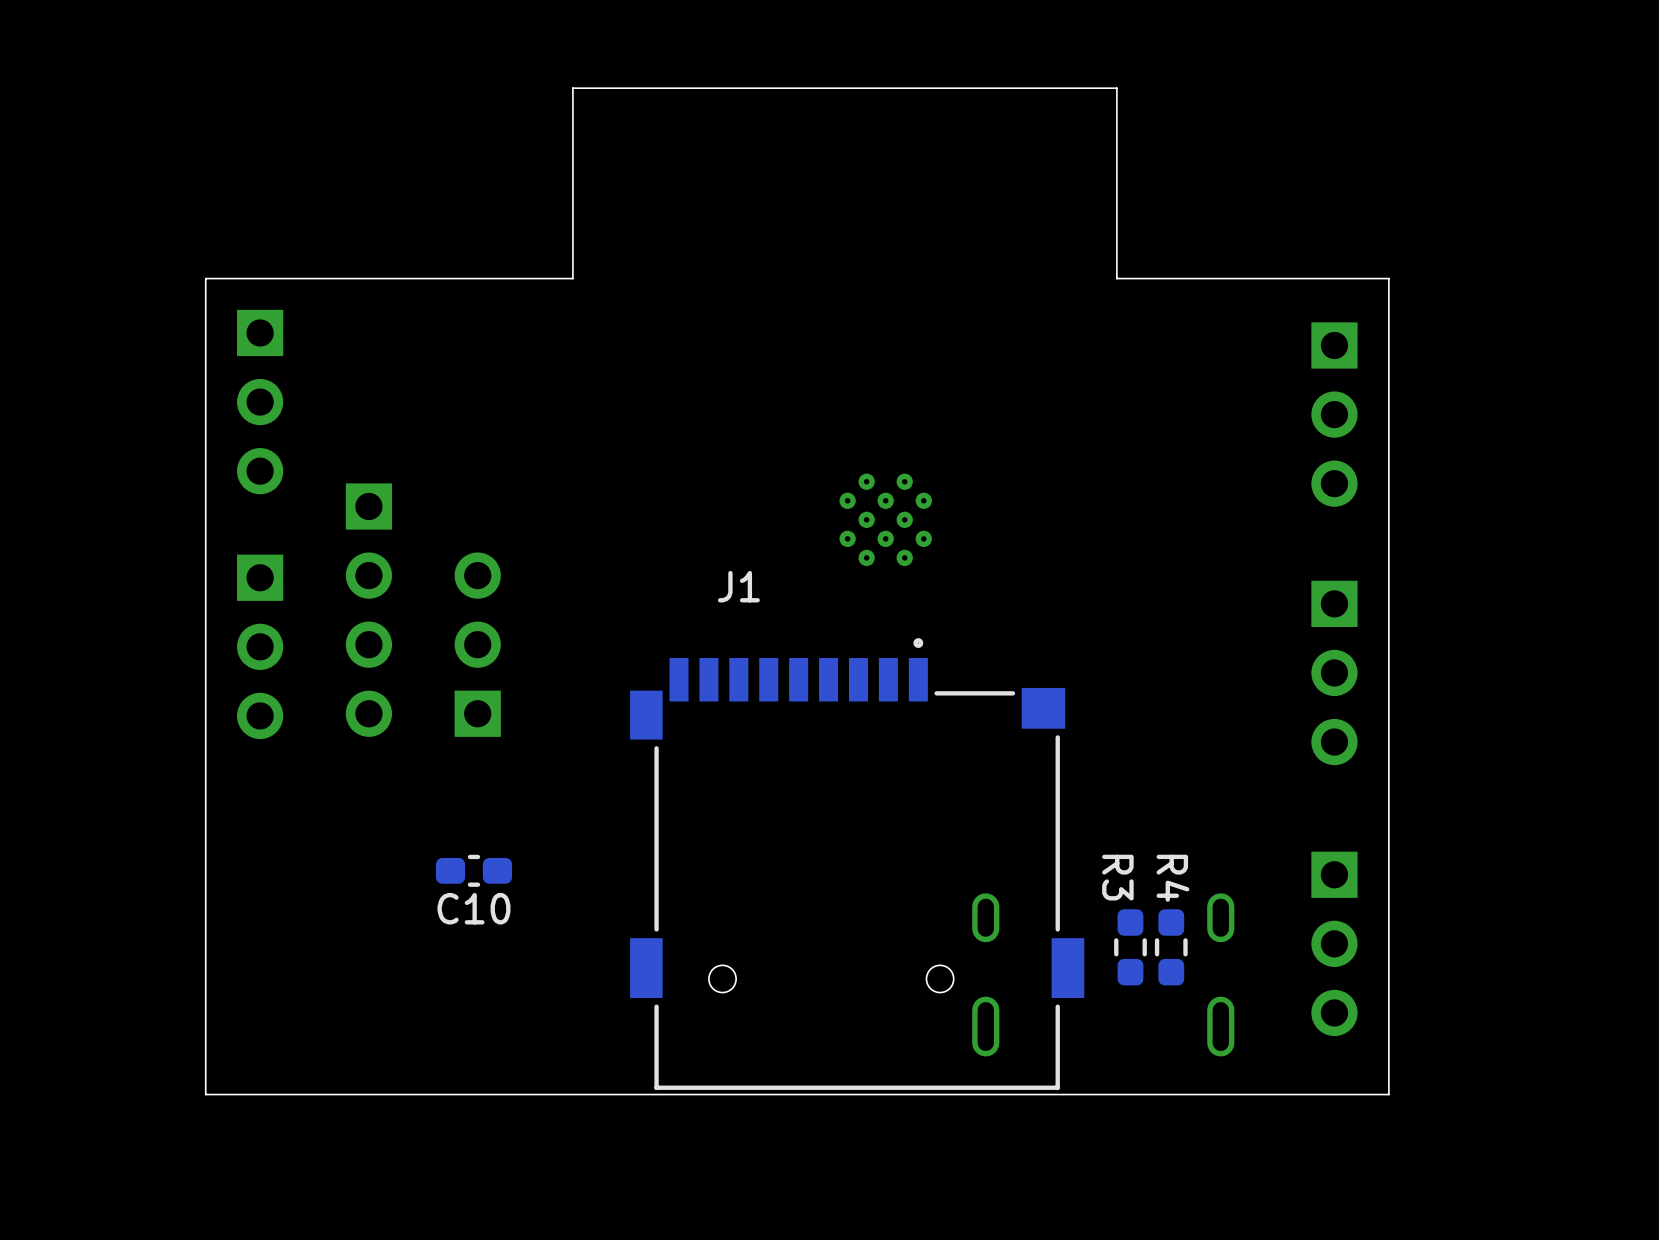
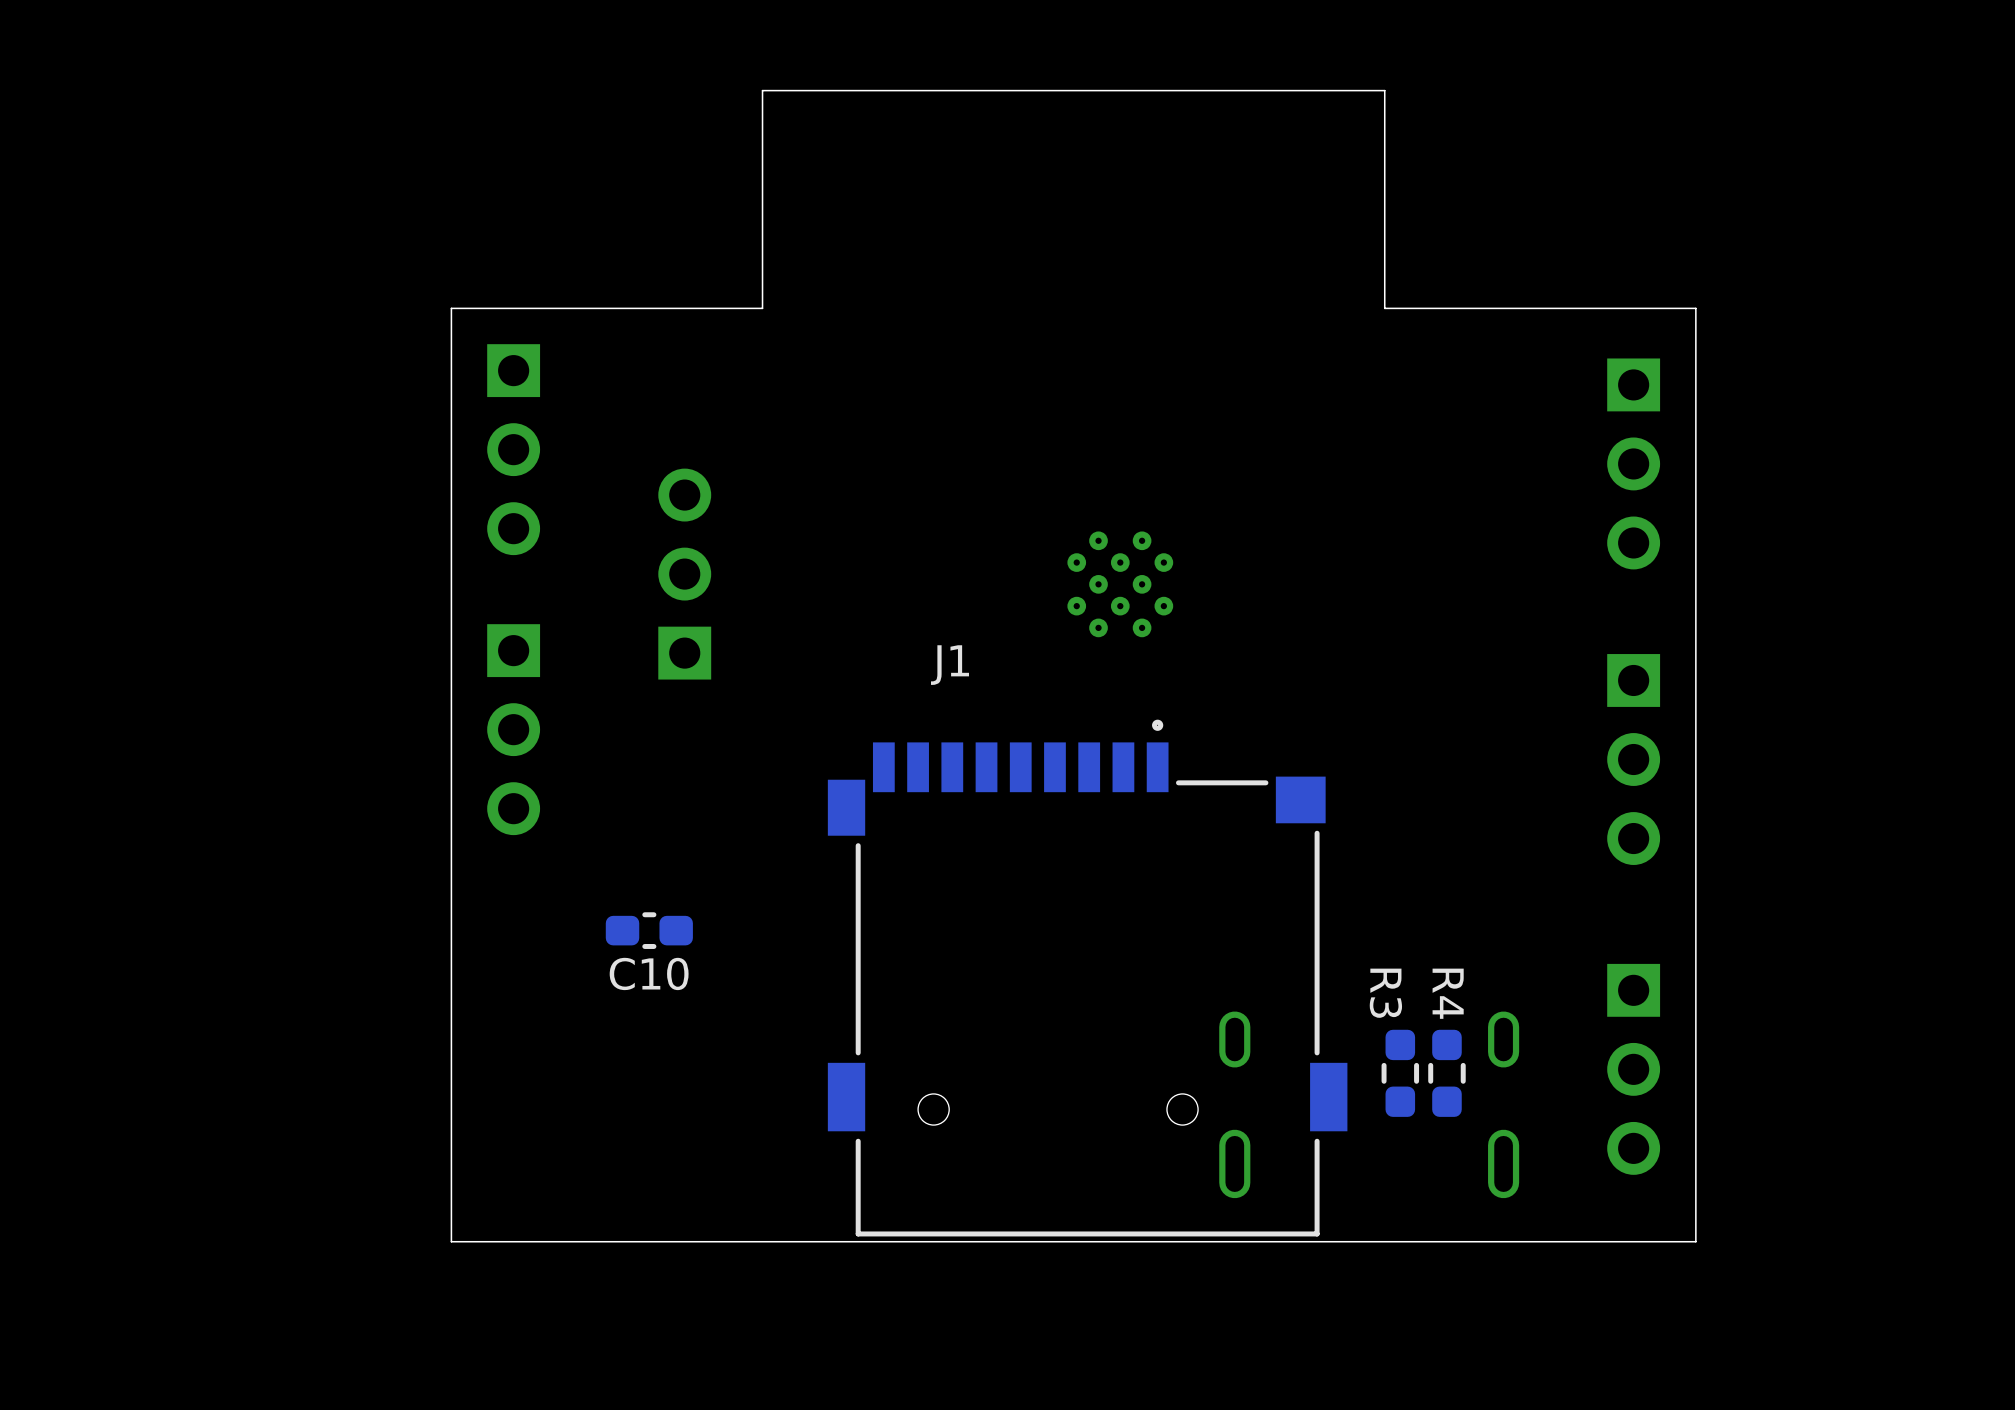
board edge: (300, 278) (205, 278) (205, 1094) (300, 1094) -> (451, 308) (451, 1241)
part position: (260, 402) -> (513, 449)
part: none -> (684, 574)
part: (368, 610) -> none
part: (477, 644) -> none
part: (260, 646) -> none
part: none -> (513, 729)
C10 position: (473, 870) -> (649, 930)

